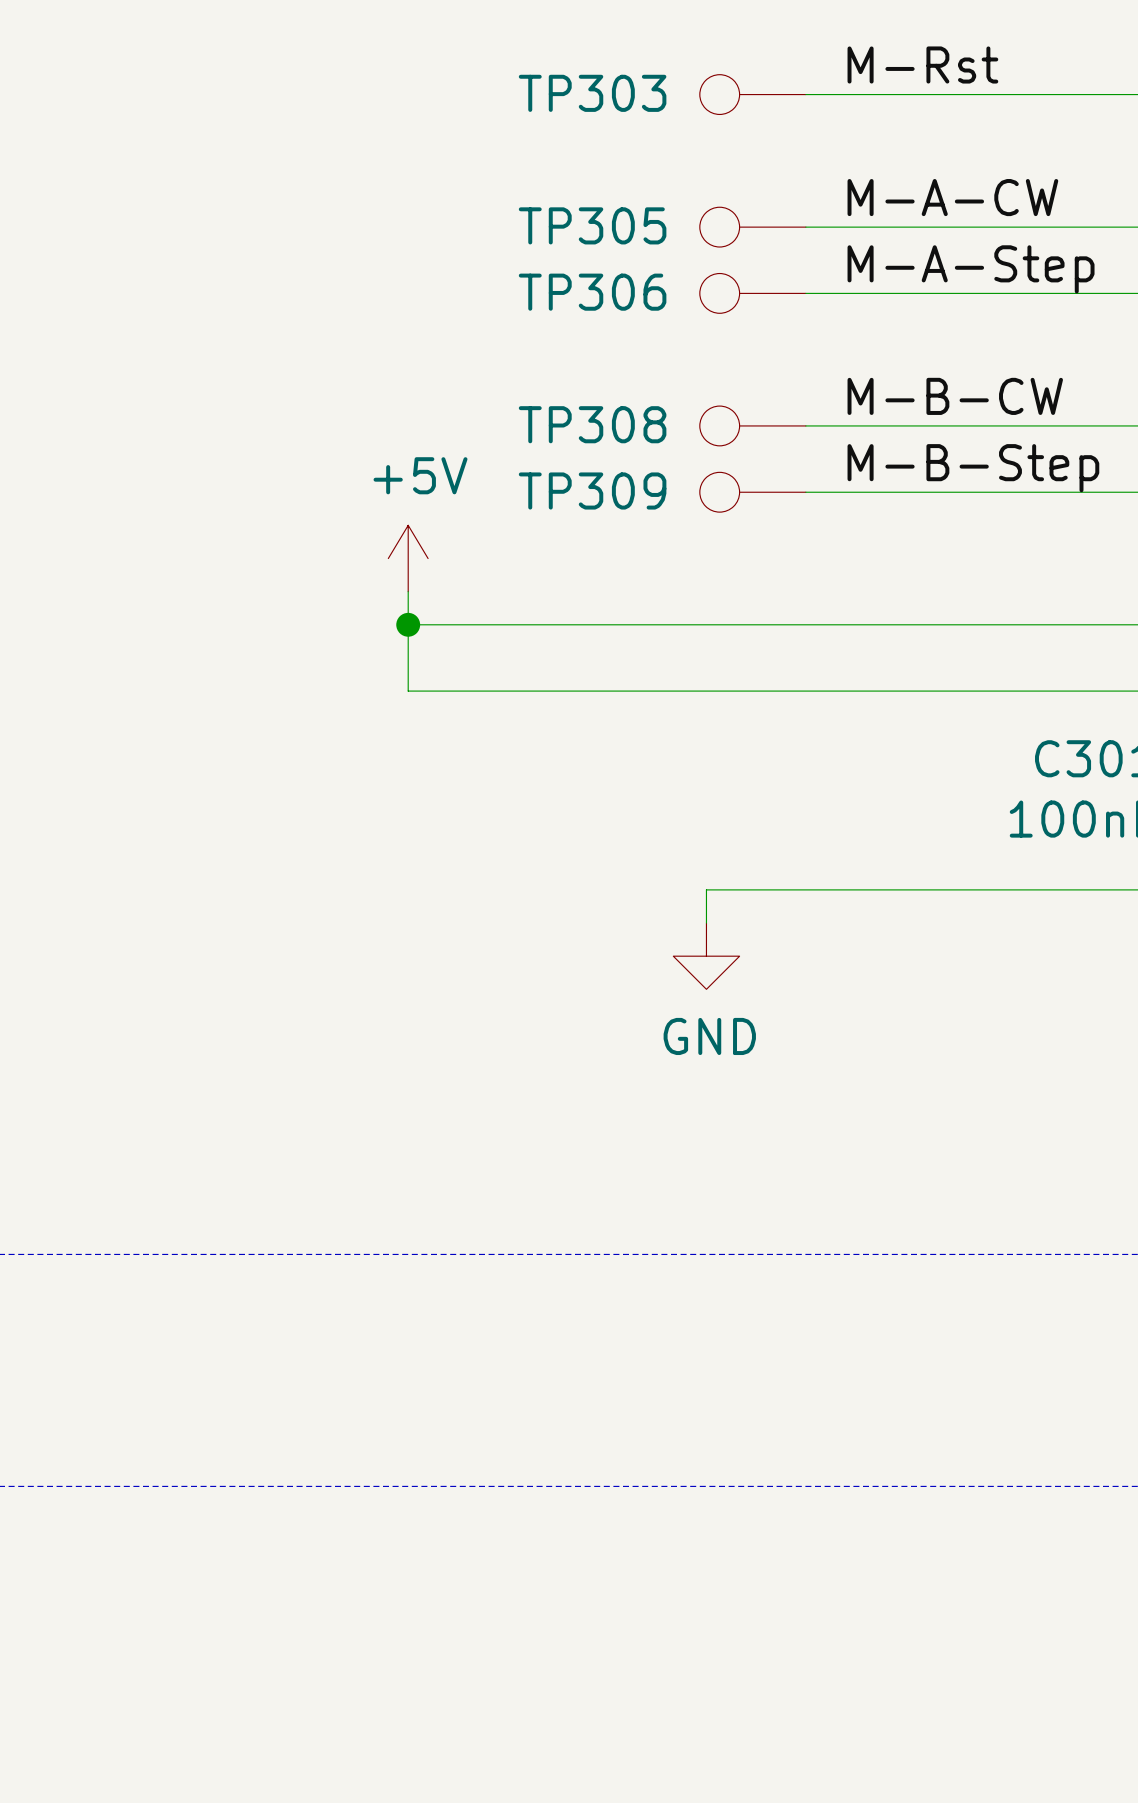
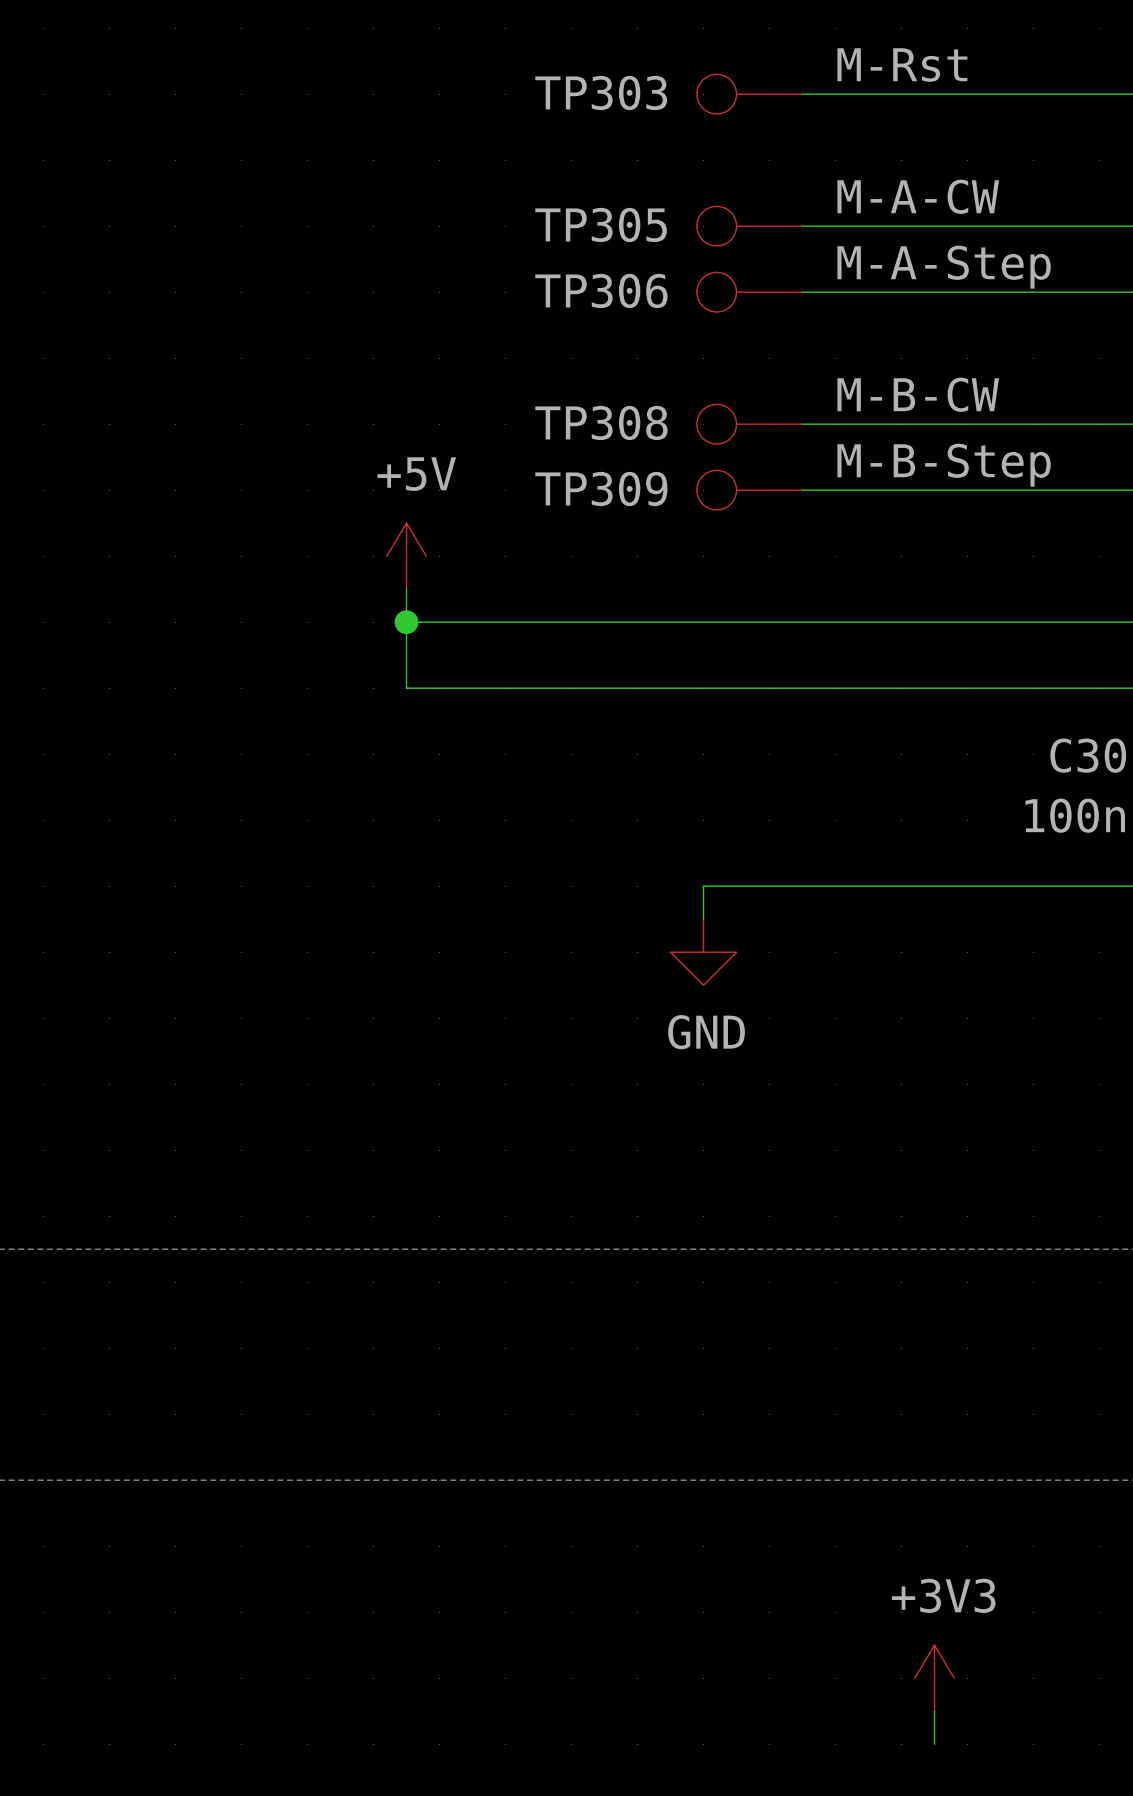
power symbol: none -> +3V3 (934, 1678)
wire: none -> (934, 1711) (934, 1744)

